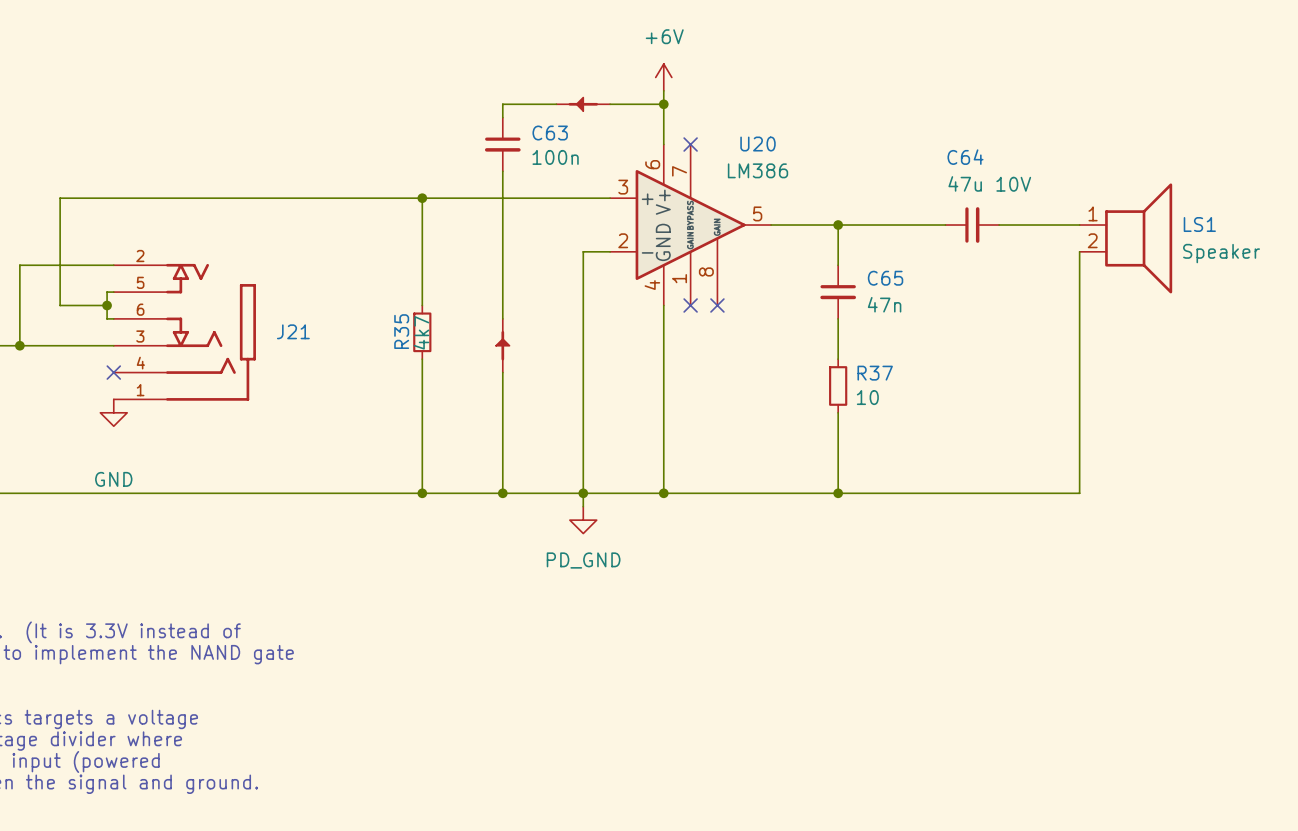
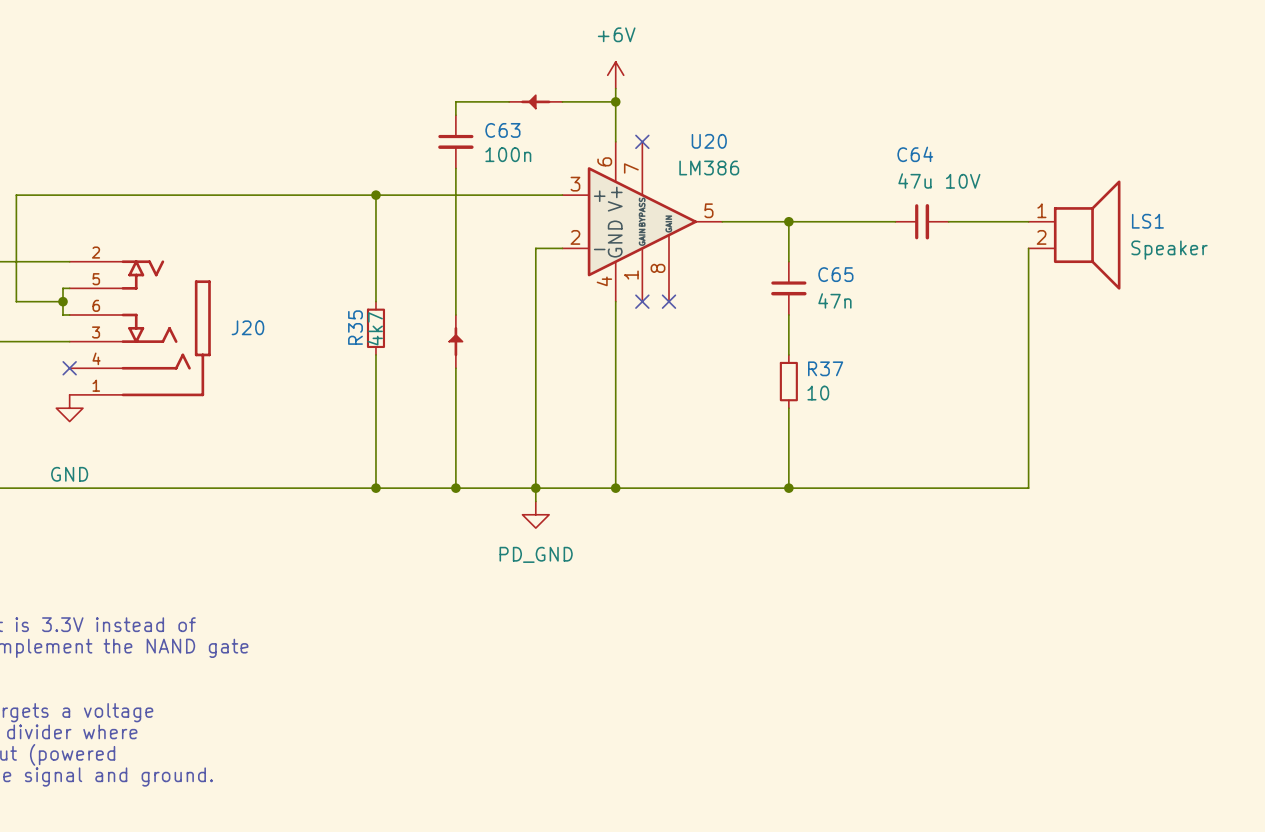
J21 name: J21 (293, 331) -> J20 (247, 327)

